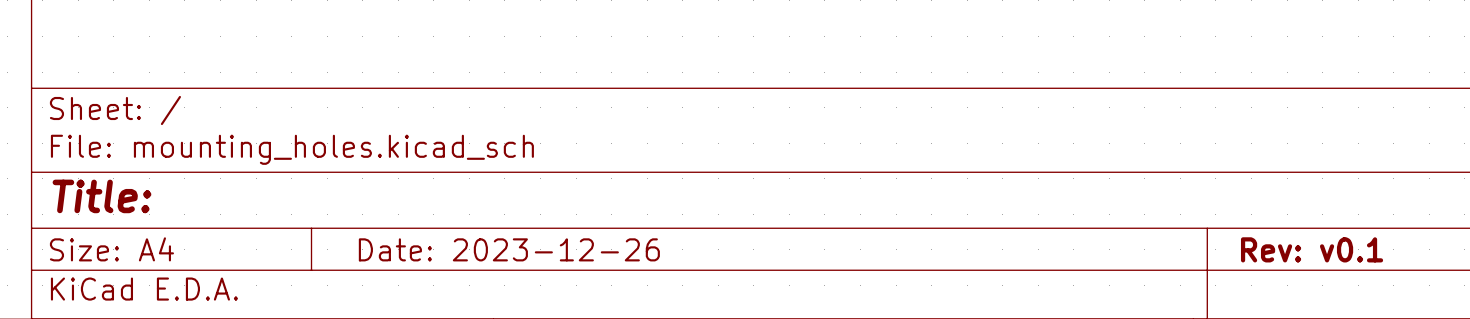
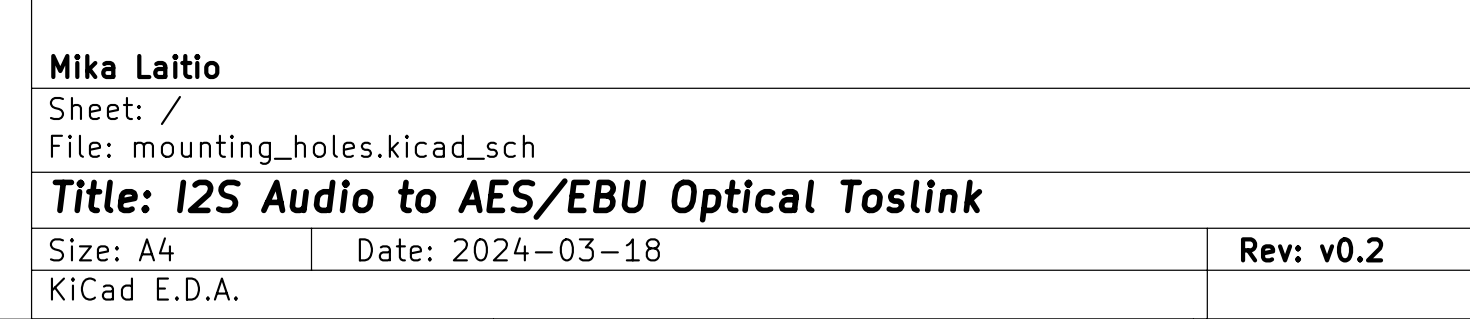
title block: none -> Mika Laitio (135, 66)
title block: Title: (101, 196) -> Title: I2S Audio to AES/EBU Optical Toslink (517, 200)
title block: Date: 2023-12-26 (509, 249) -> Date: 2024-03-18 (509, 249)
title block: Rev: v0.1 (1312, 249) -> Rev: v0.2 (1312, 249)

